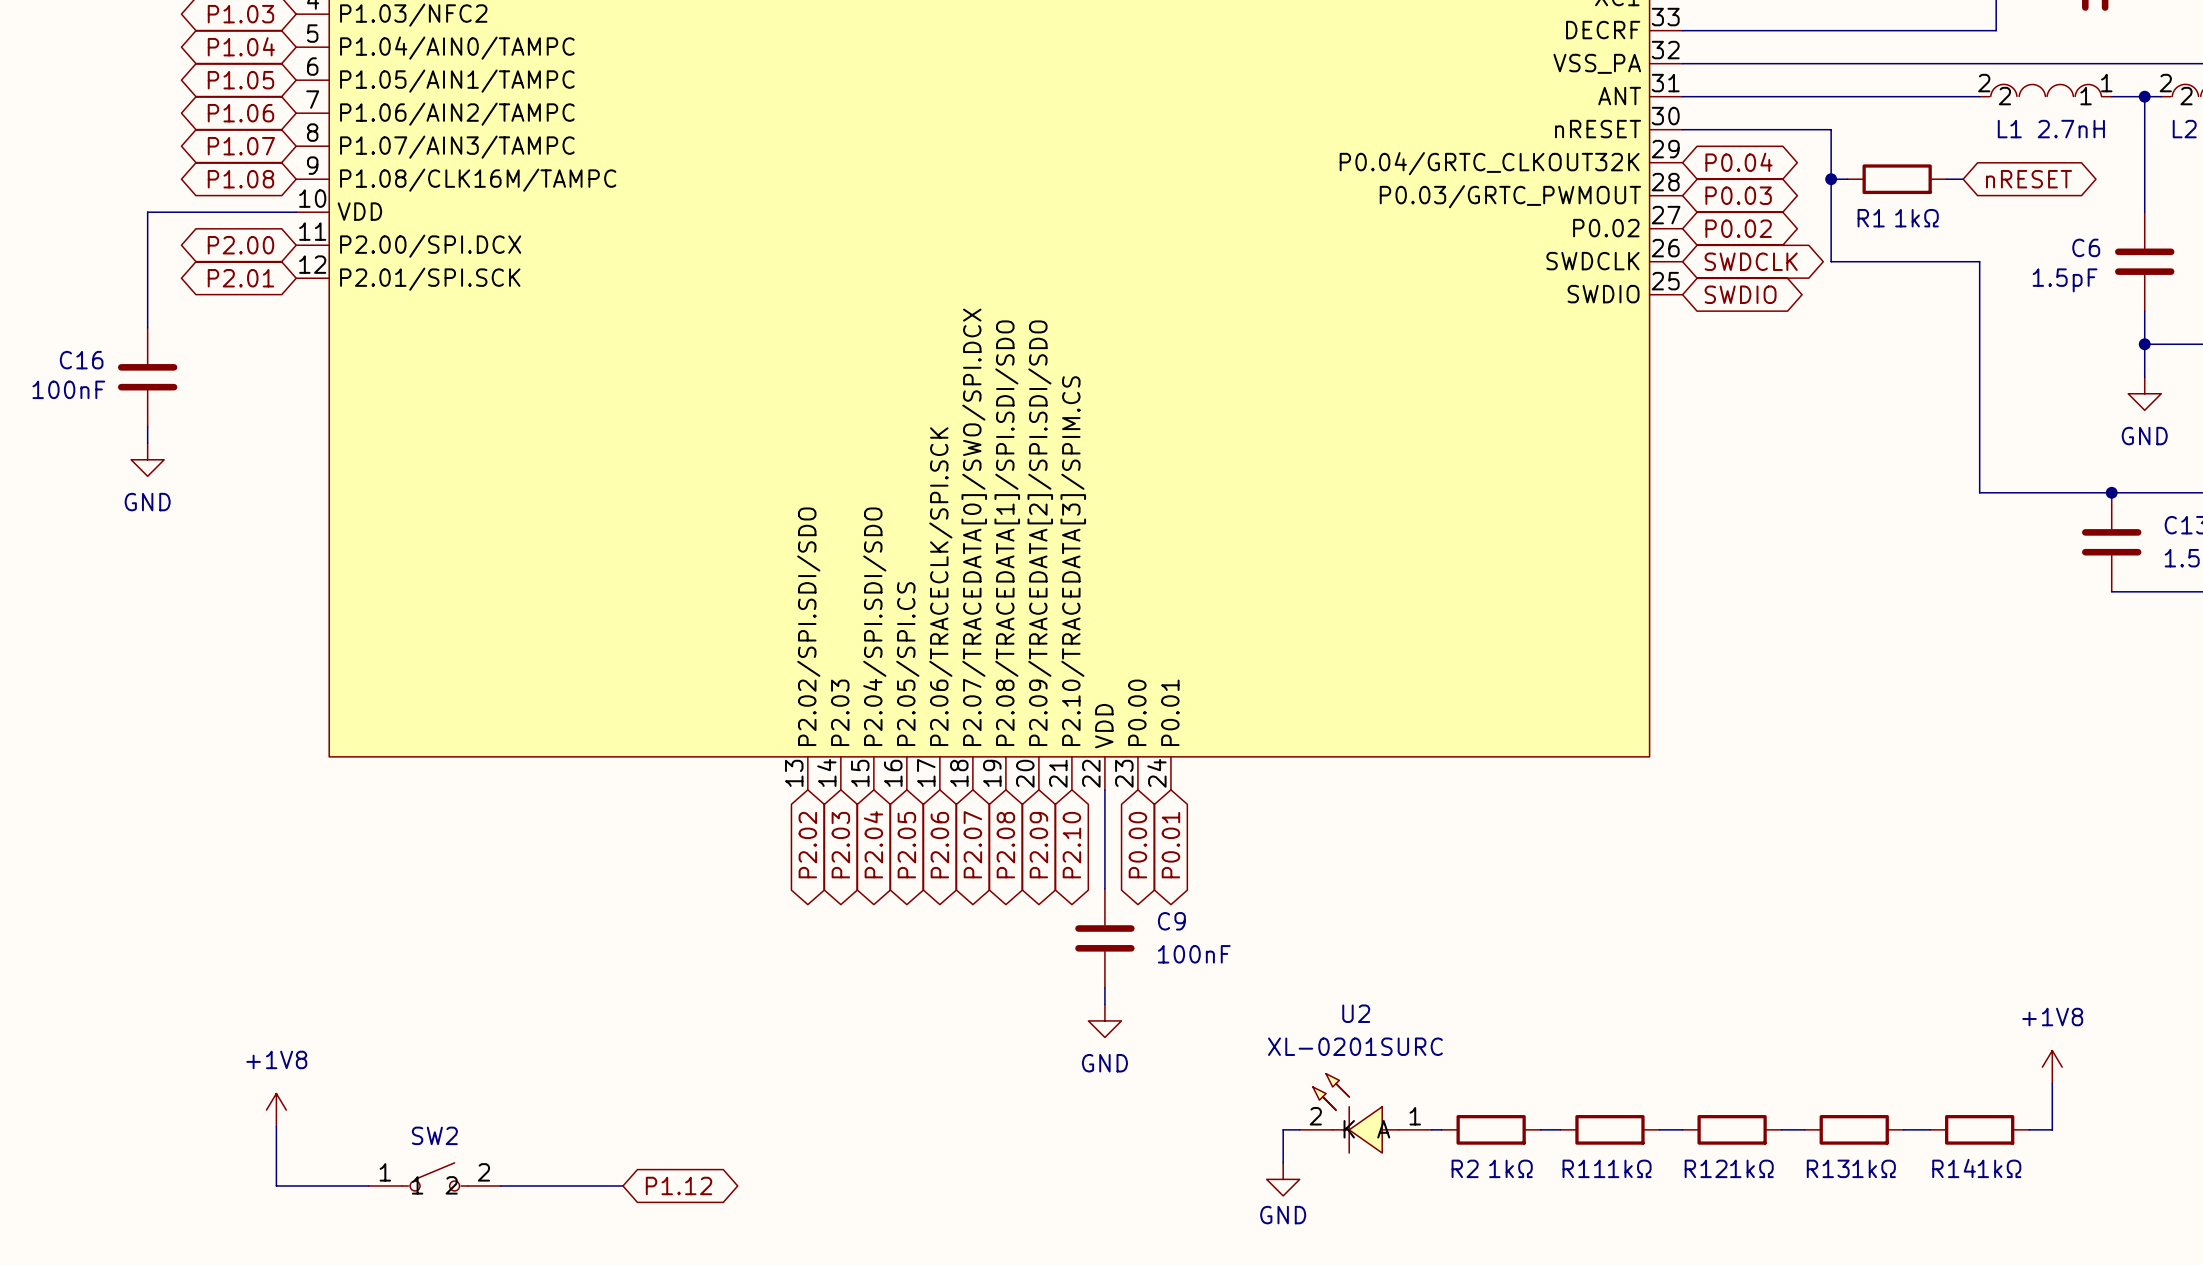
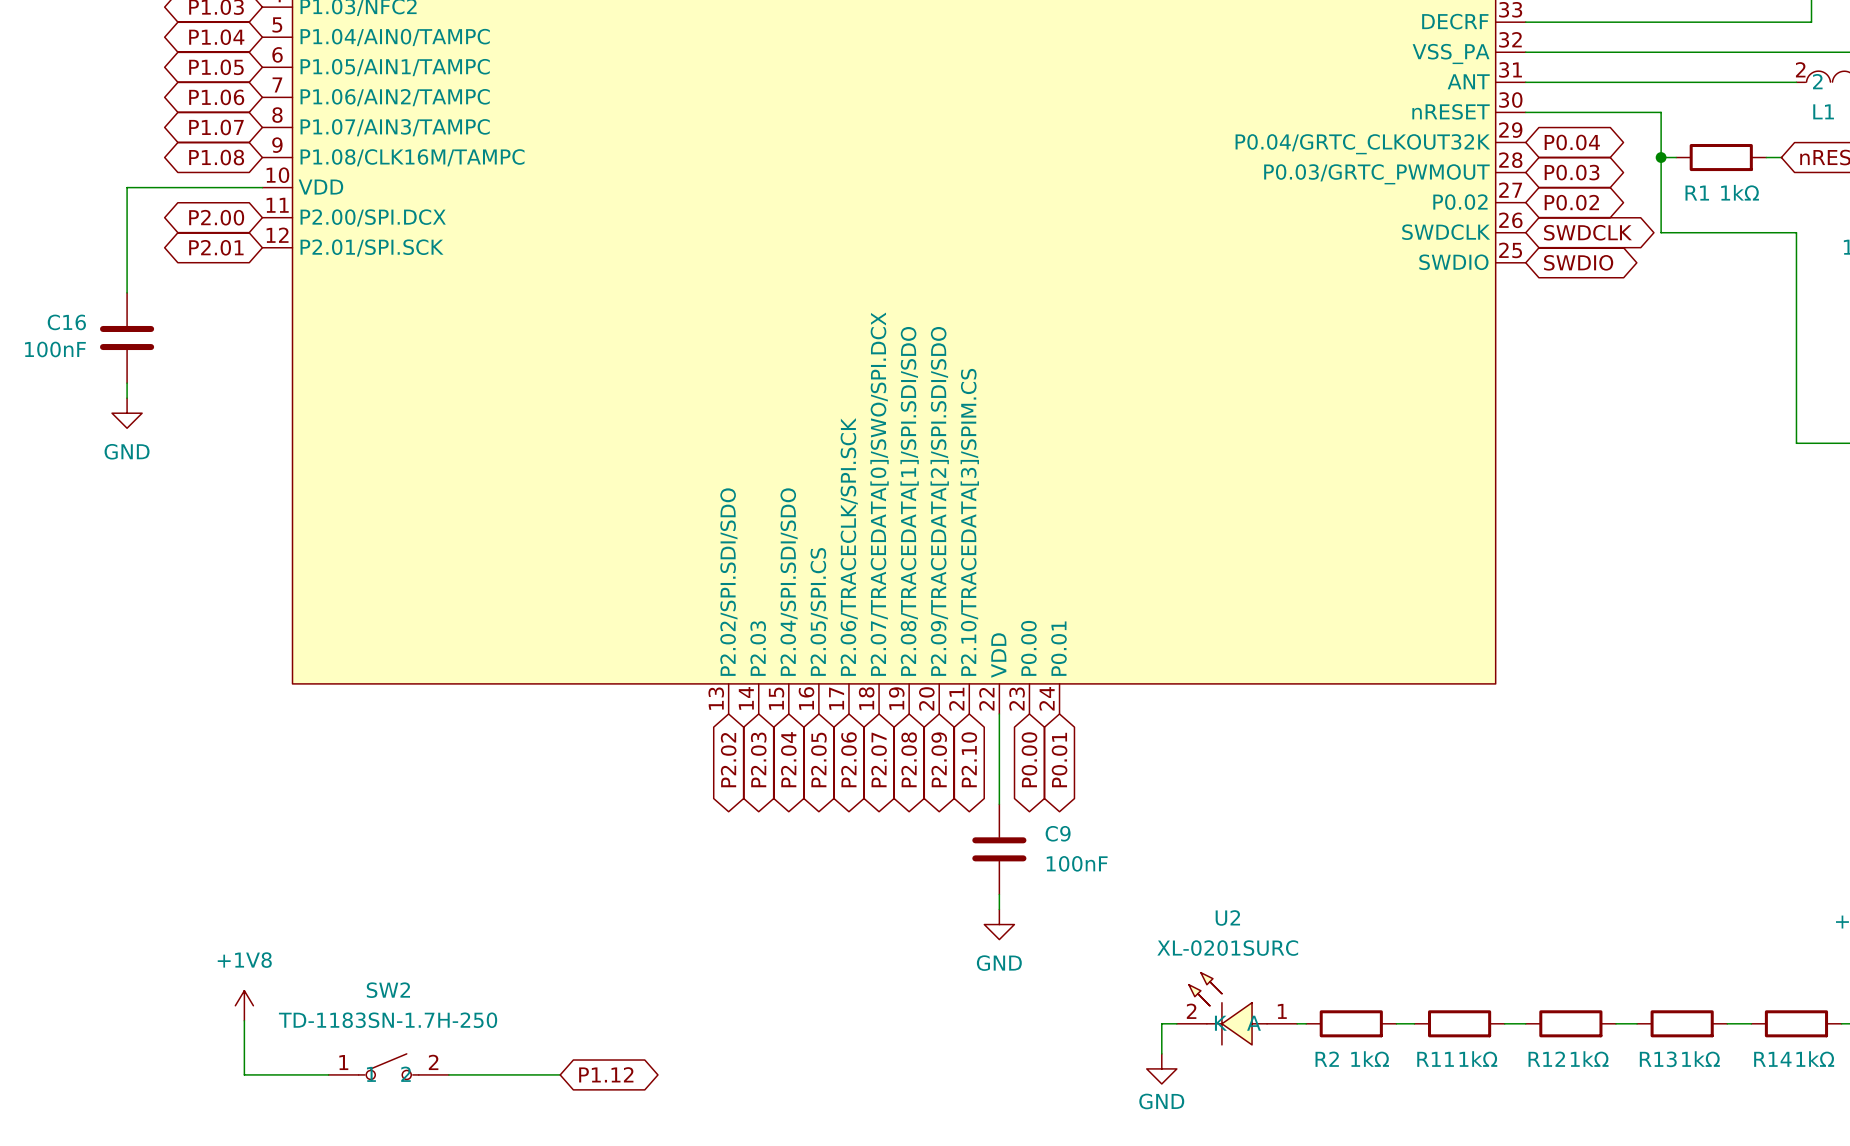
SW2 value: none -> TD-1183SN-1.7H-250 (388, 1020)
SW2 name position: SW2 (434, 1135) -> SW2 (388, 990)

